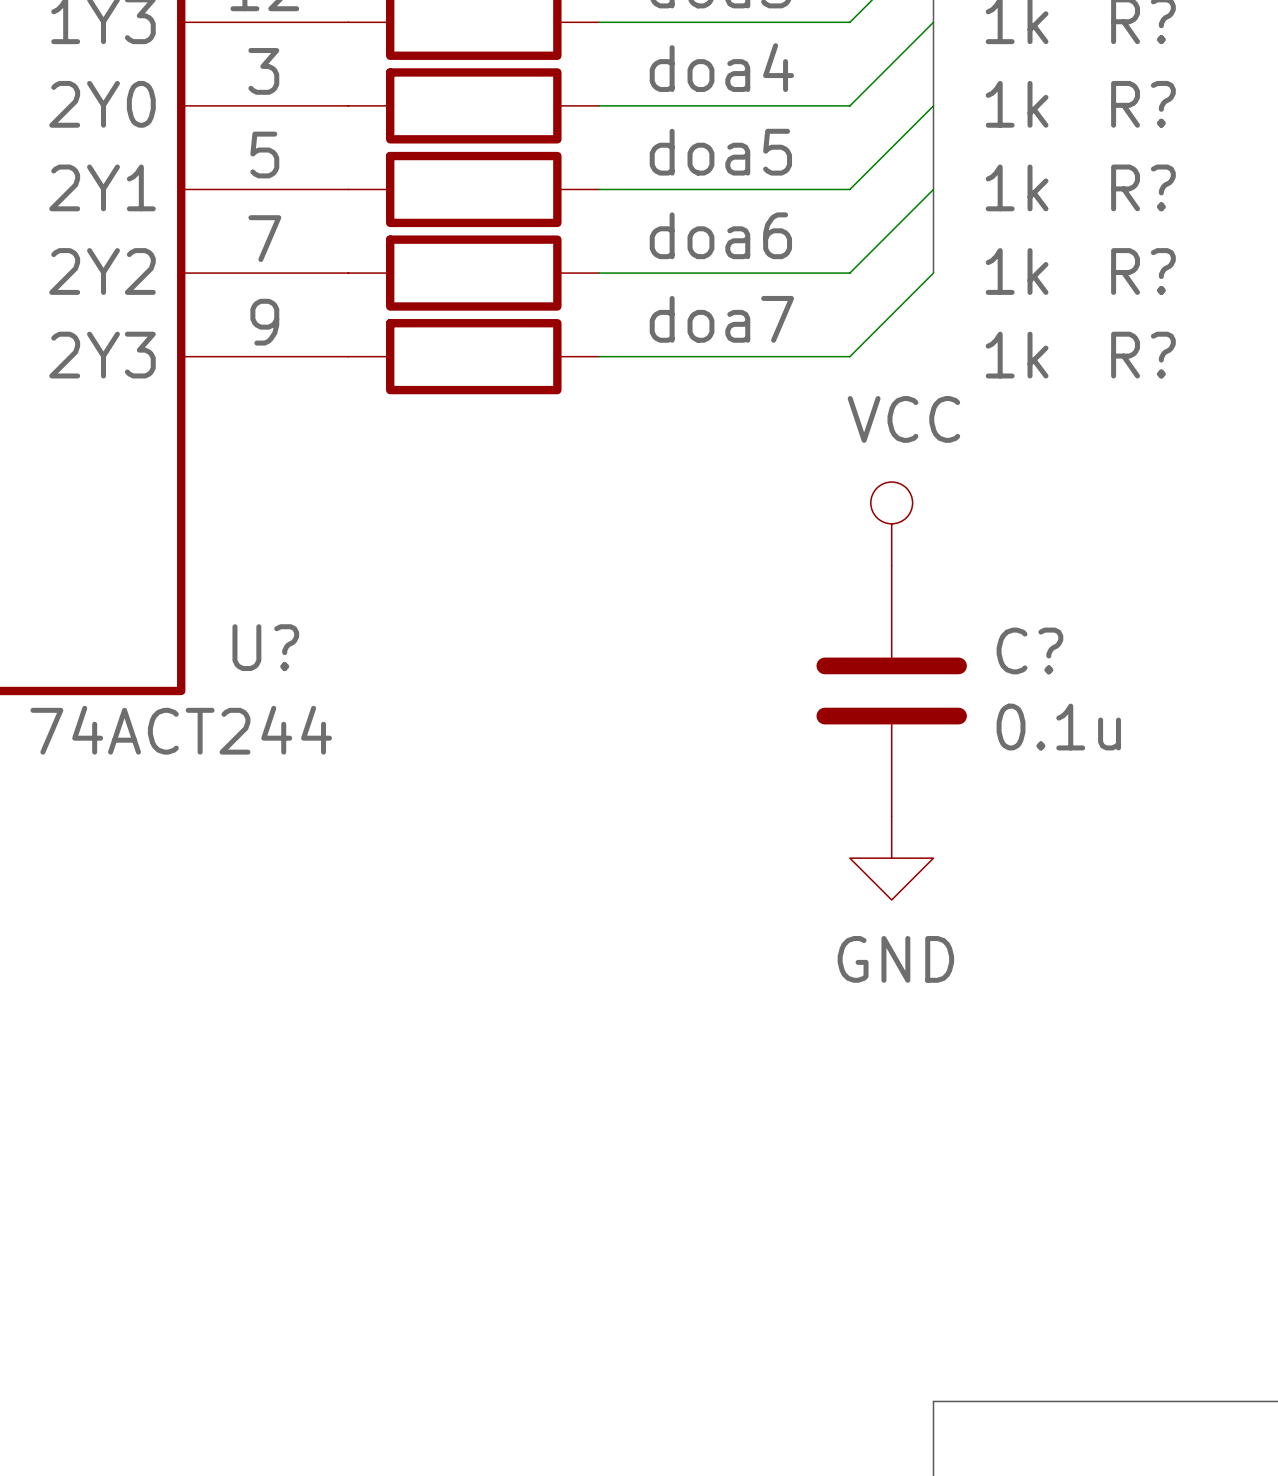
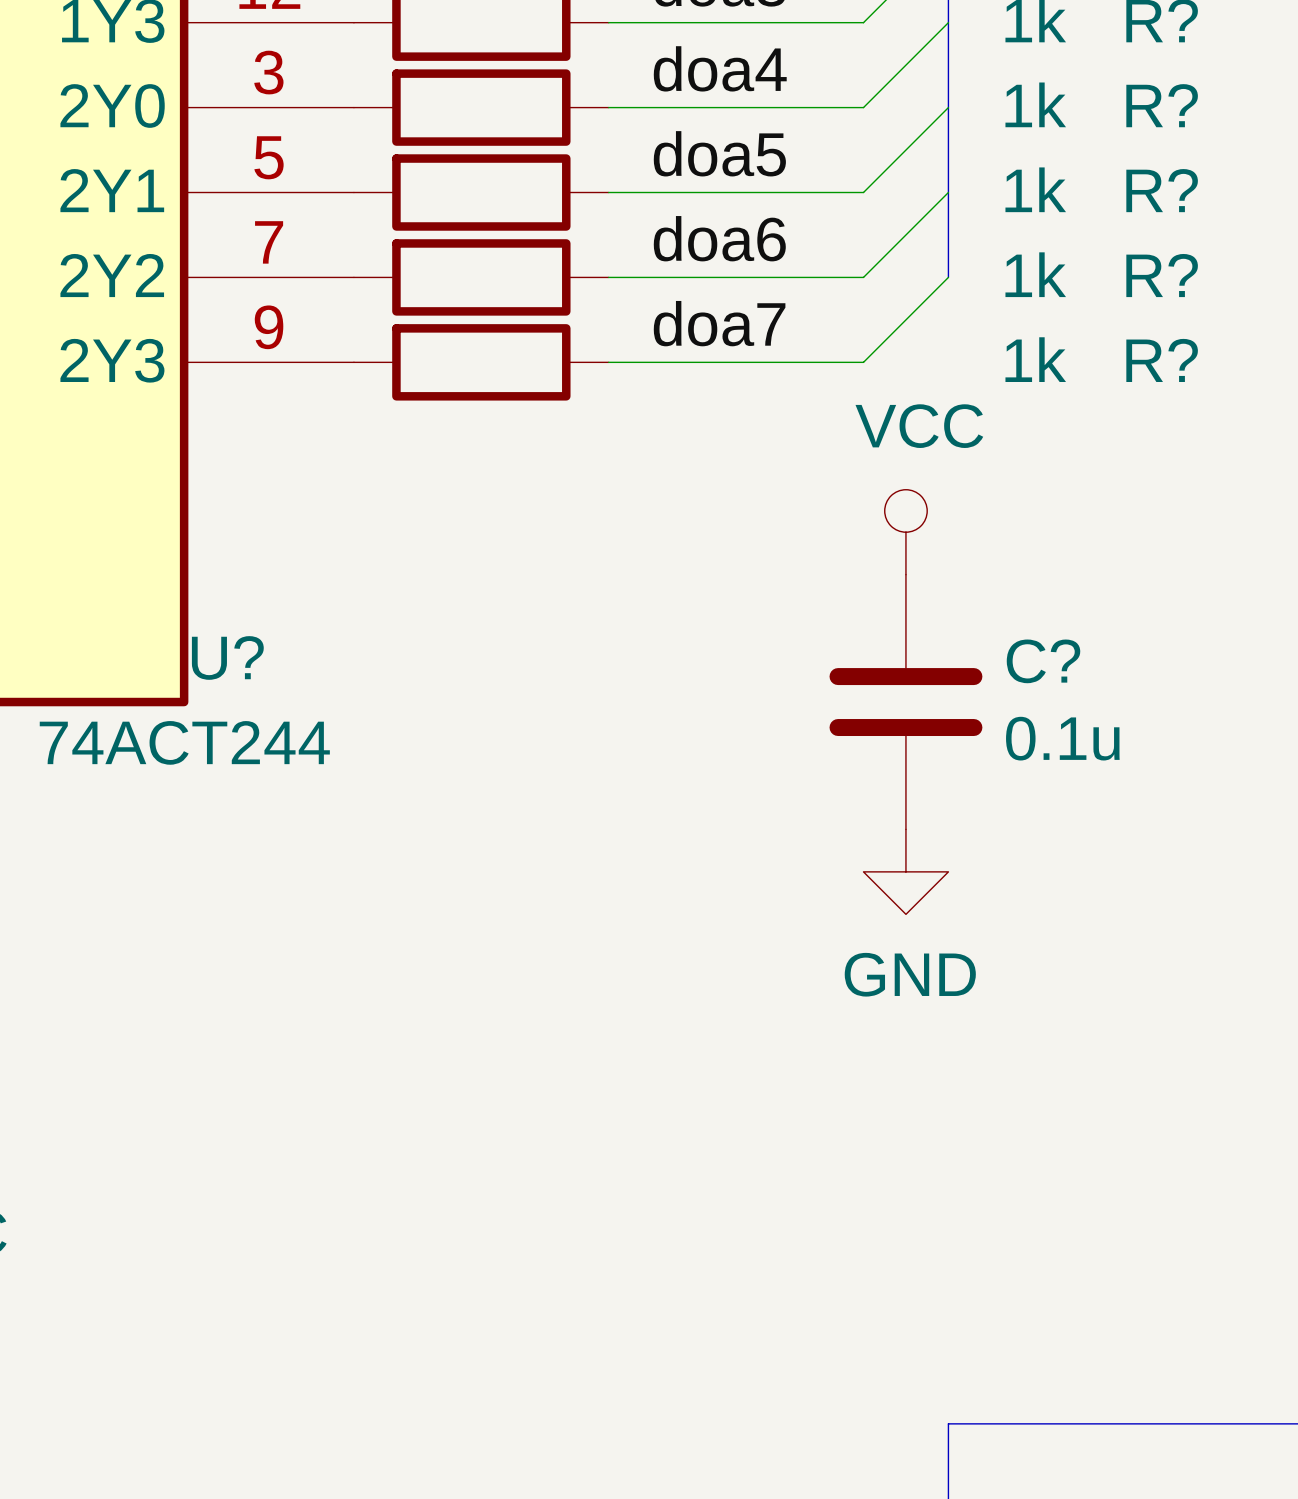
U? name position: U? (265, 647) -> U? (227, 657)

